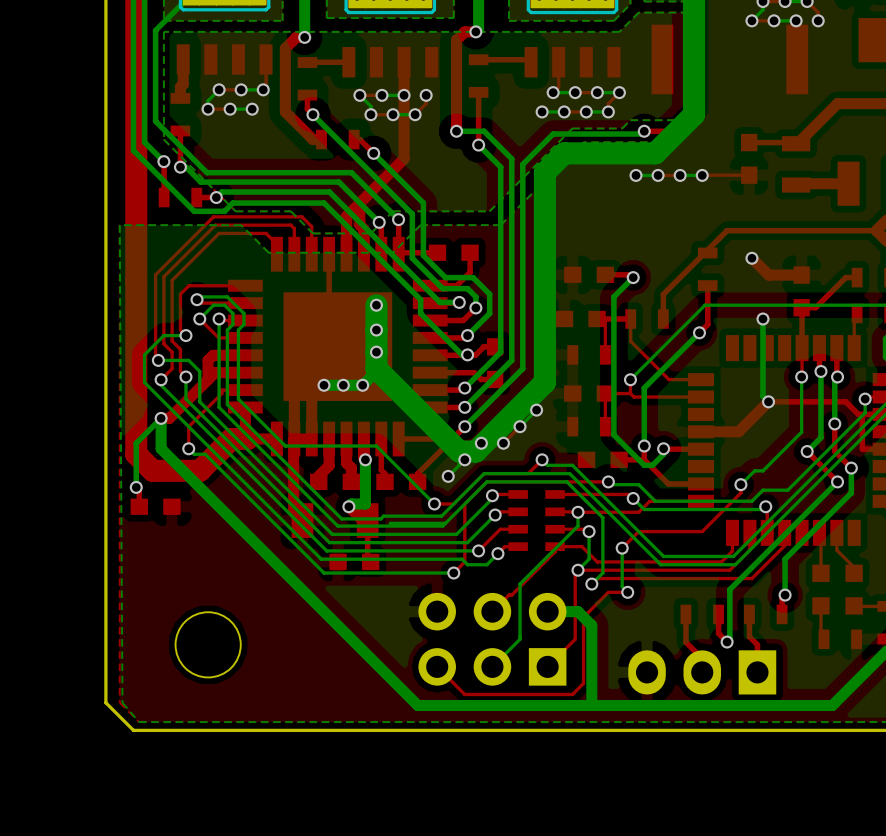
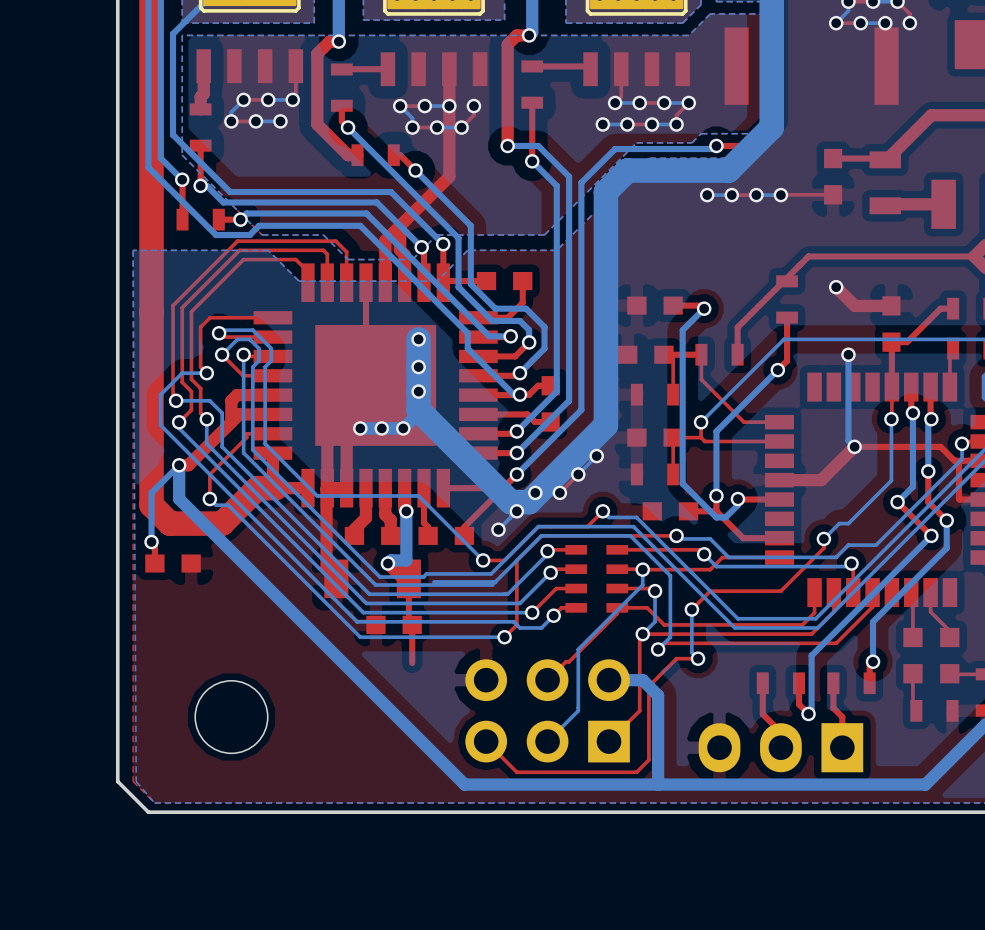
top track: none -> (412, 624) (412, 662)

